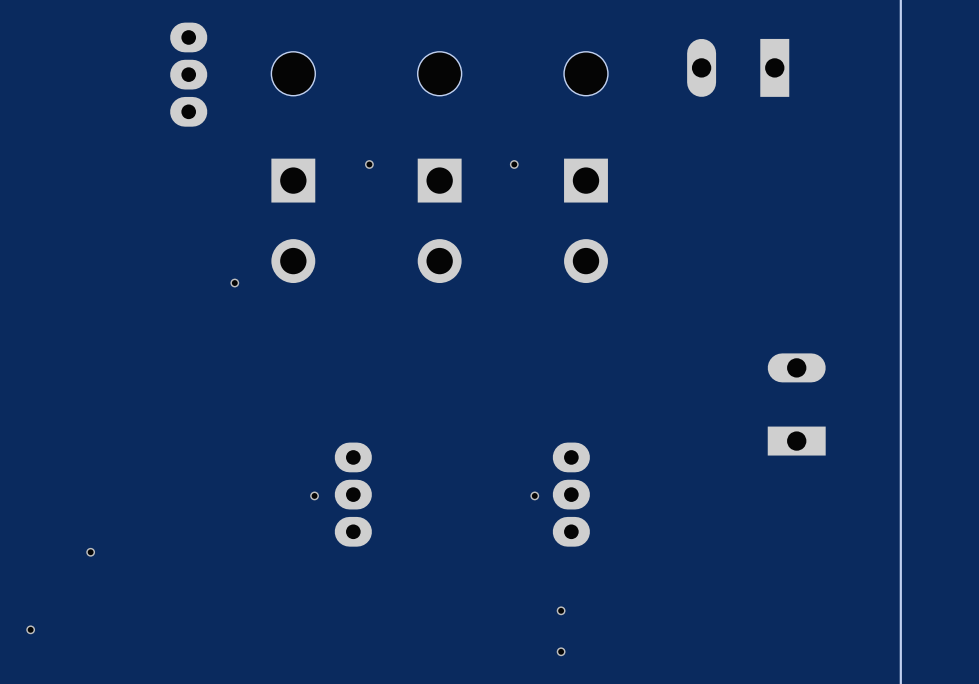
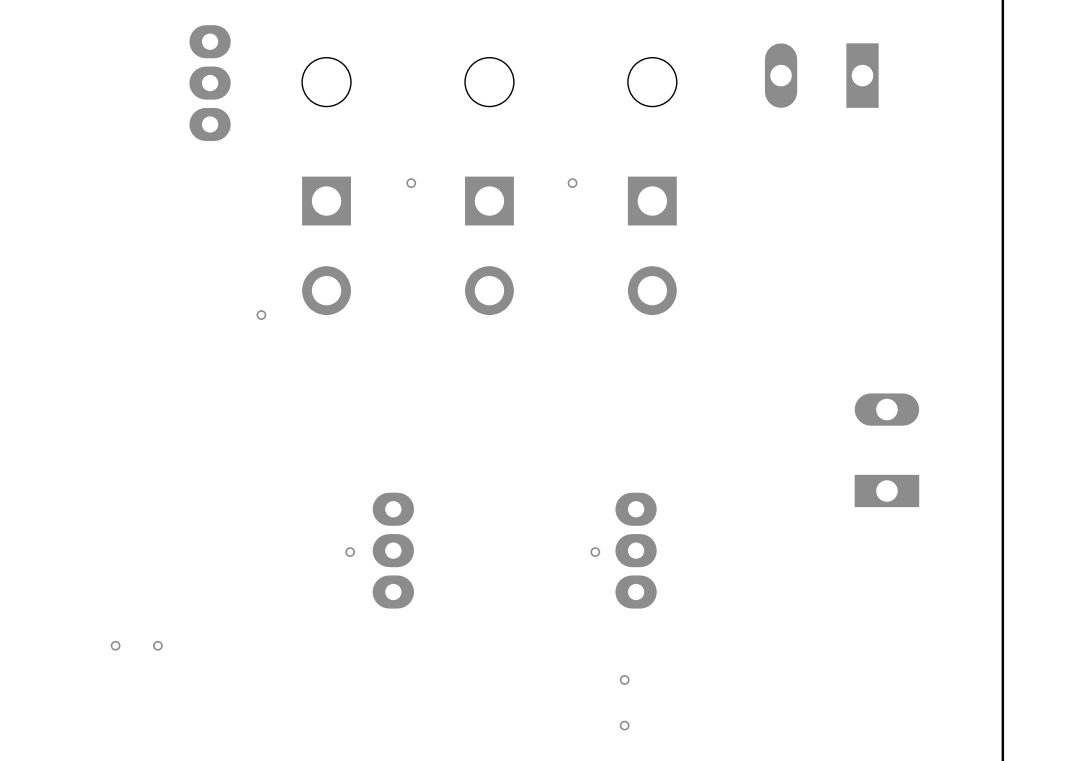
via: (90, 552) -> none
via: none -> (115, 645)
via: none -> (157, 645)
via: (30, 629) -> none

